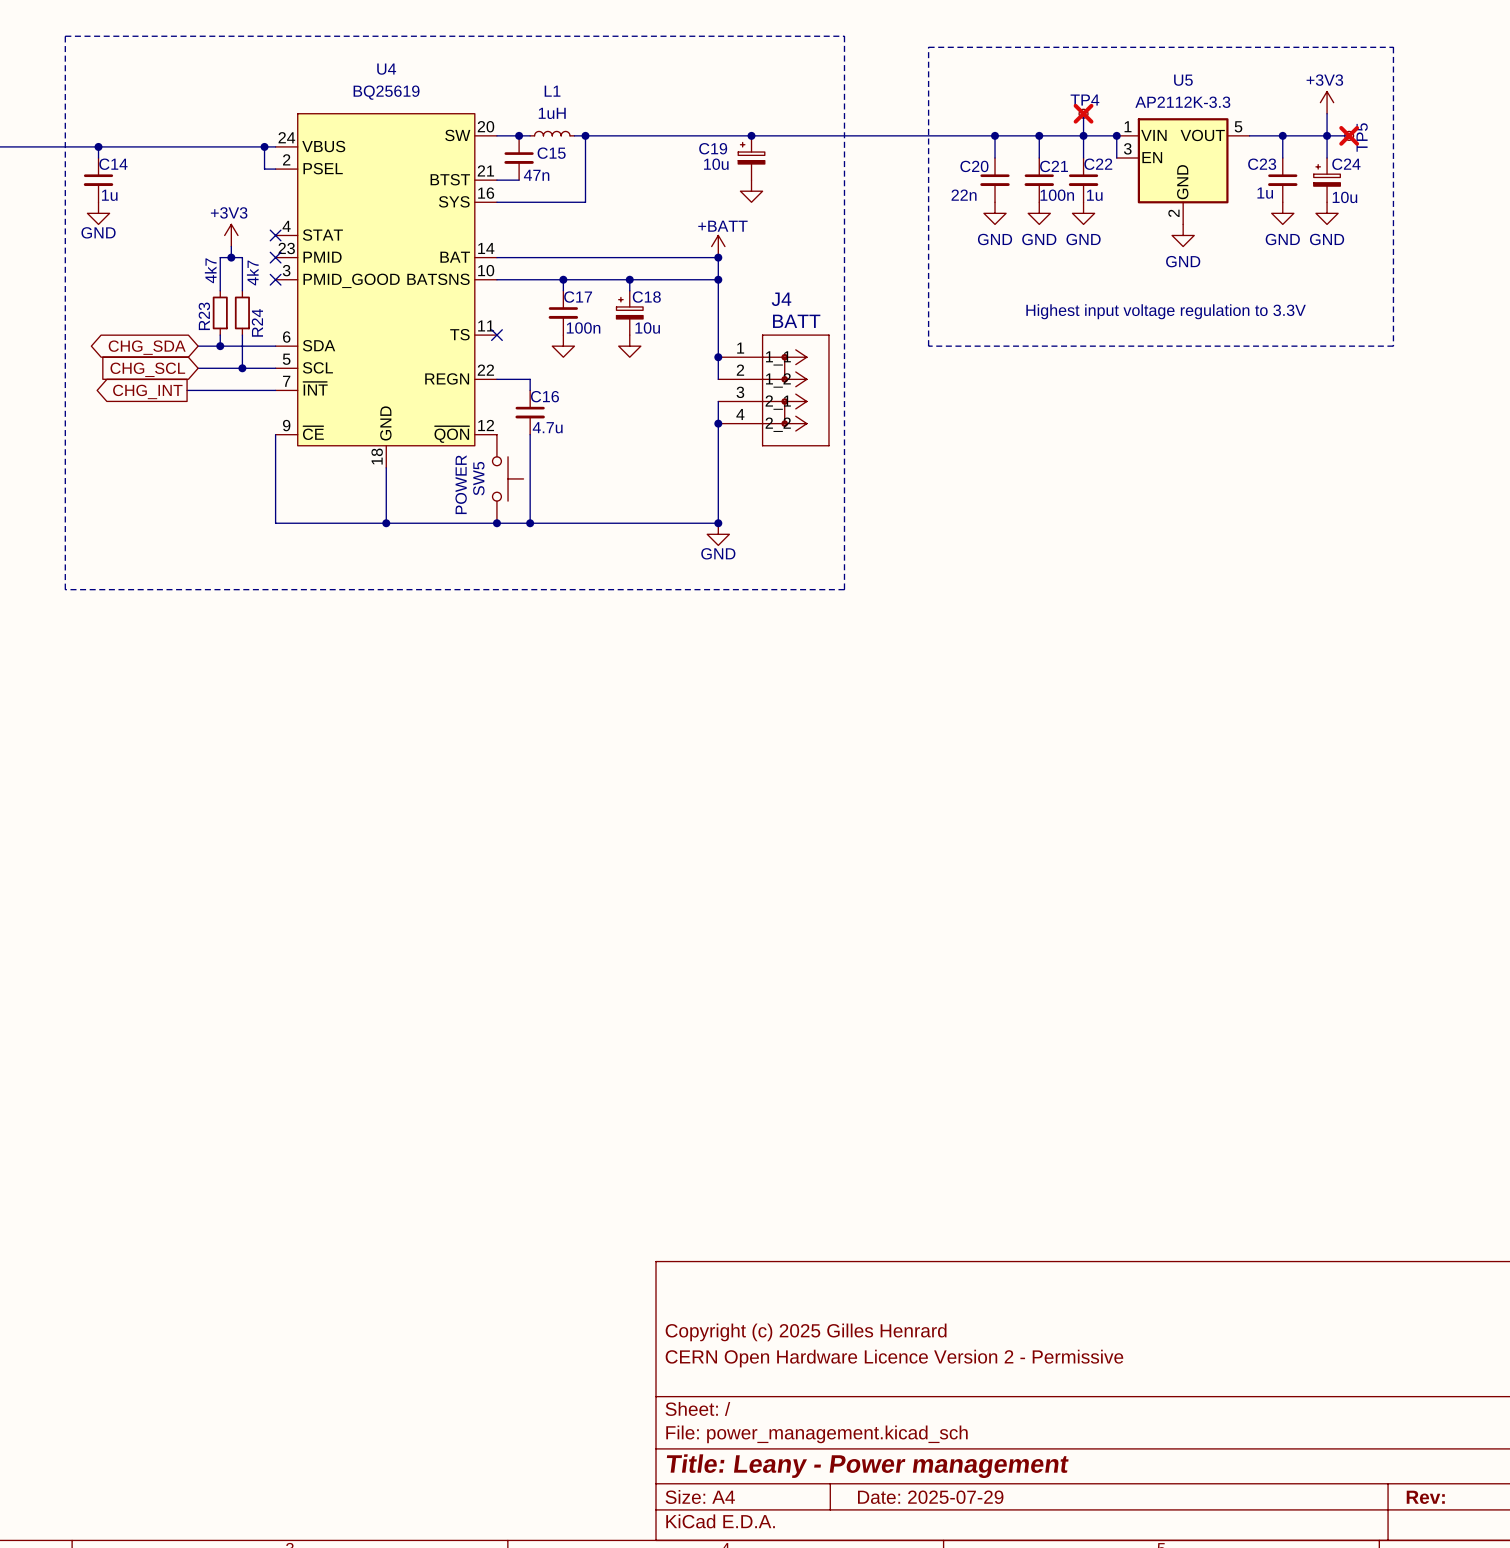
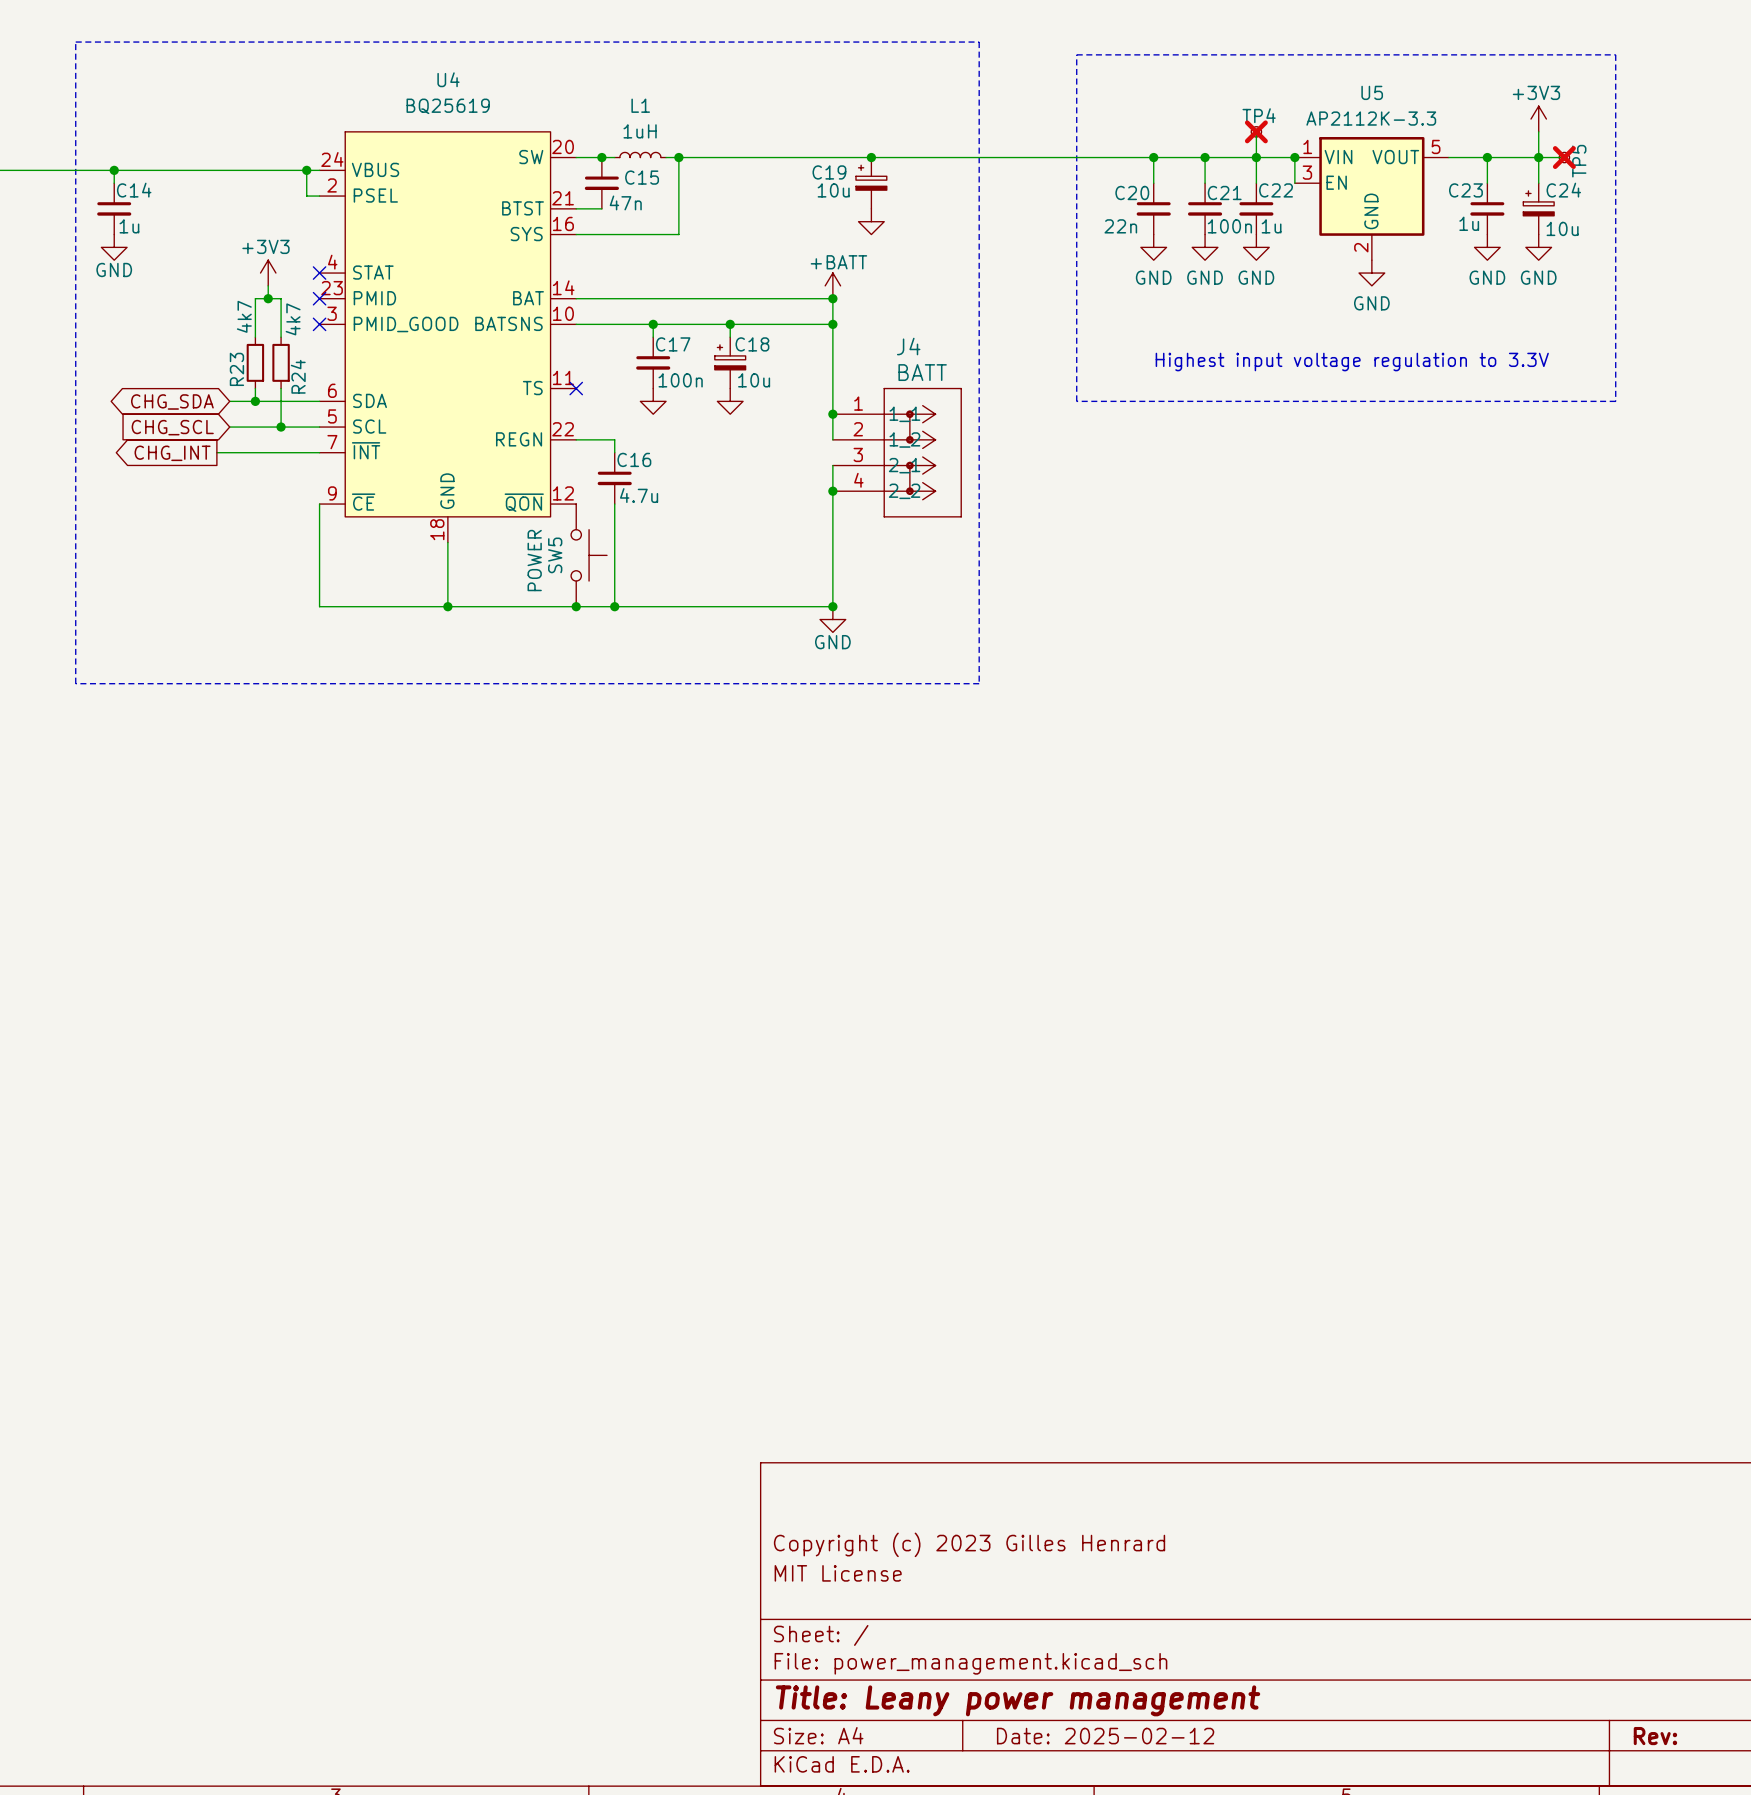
title block: Copyright (c) 2025 Gilles Henrard (806, 1332) -> Copyright (c) 2023 Gilles Henrard (969, 1544)
title block: CERN Open Hardware Licence Version 2 - Permissive (894, 1358) -> MIT License (838, 1573)
title block: Title: Leany - Power management (867, 1466) -> Title: Leany power management (1018, 1700)
title block: Date: 2025-07-29 (930, 1497) -> Date: 2025-02-12 (1105, 1736)

